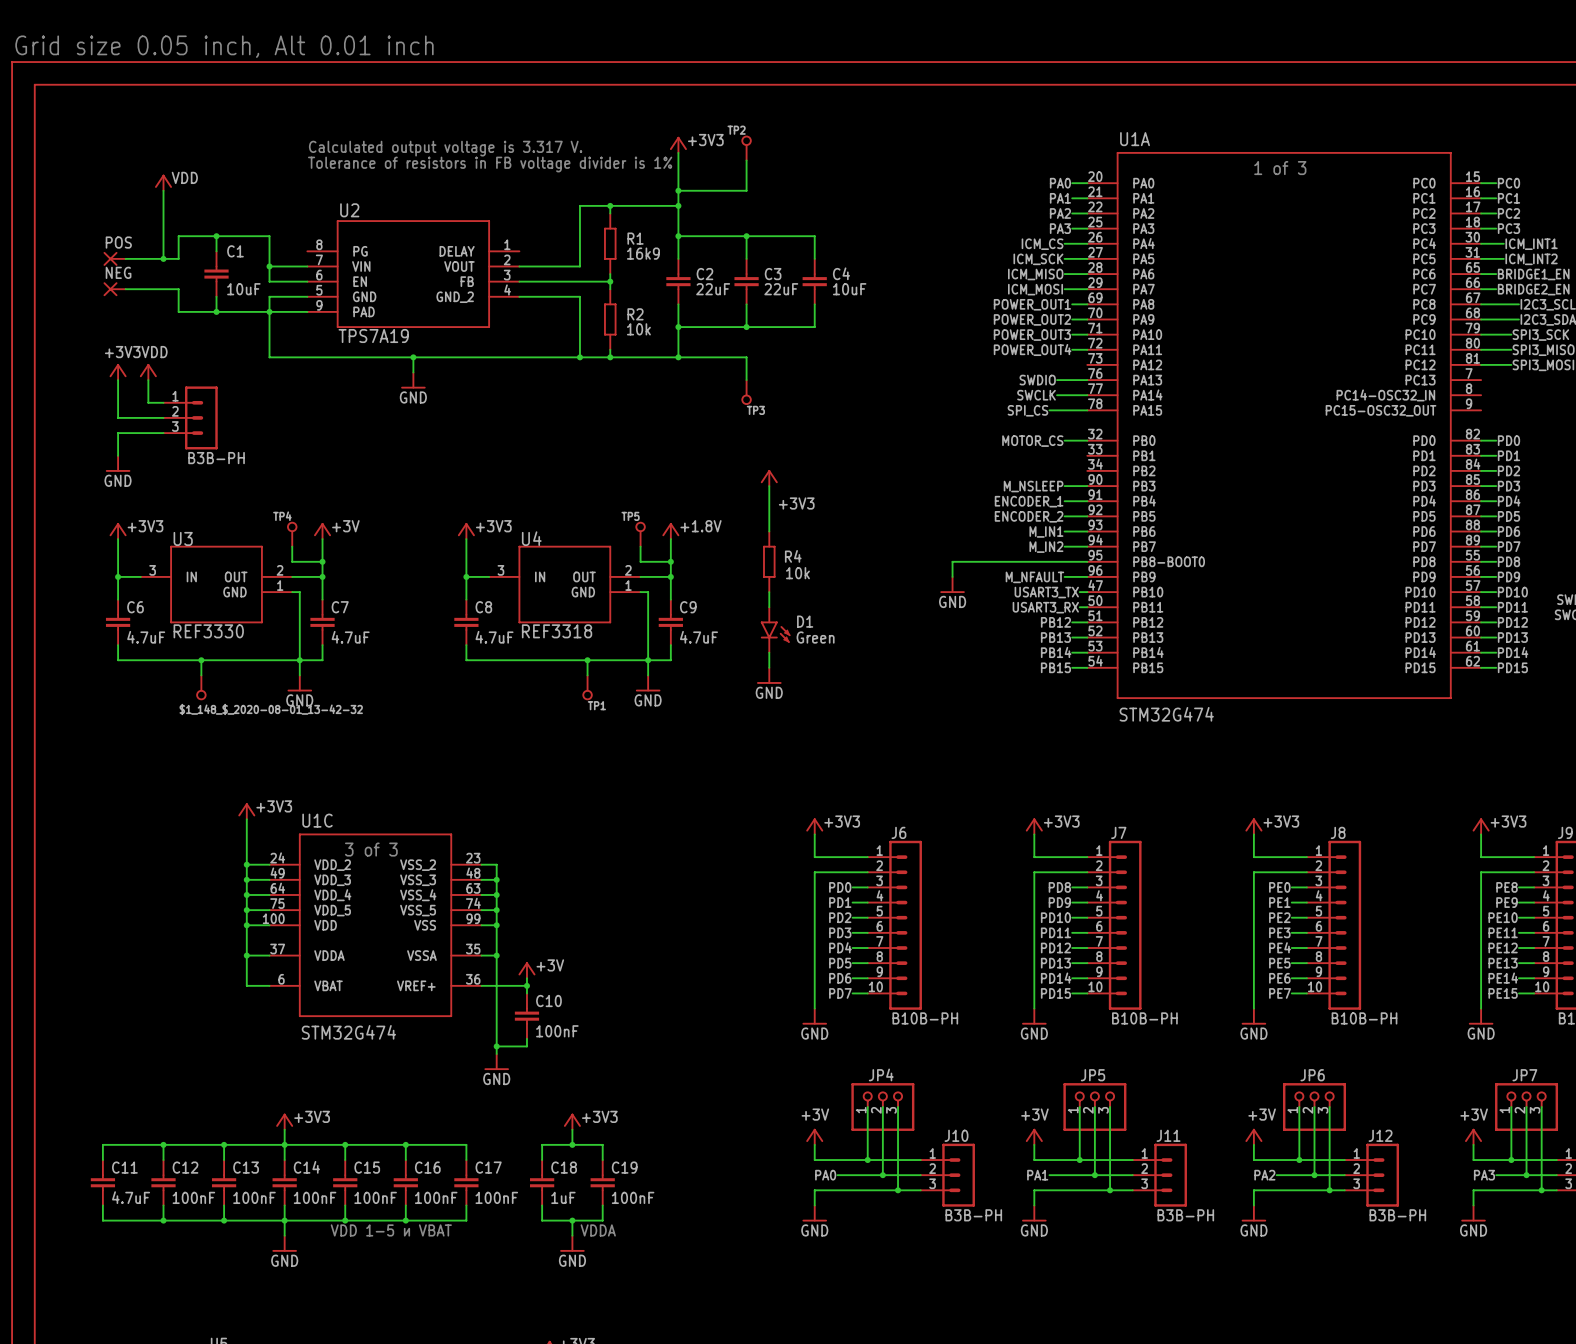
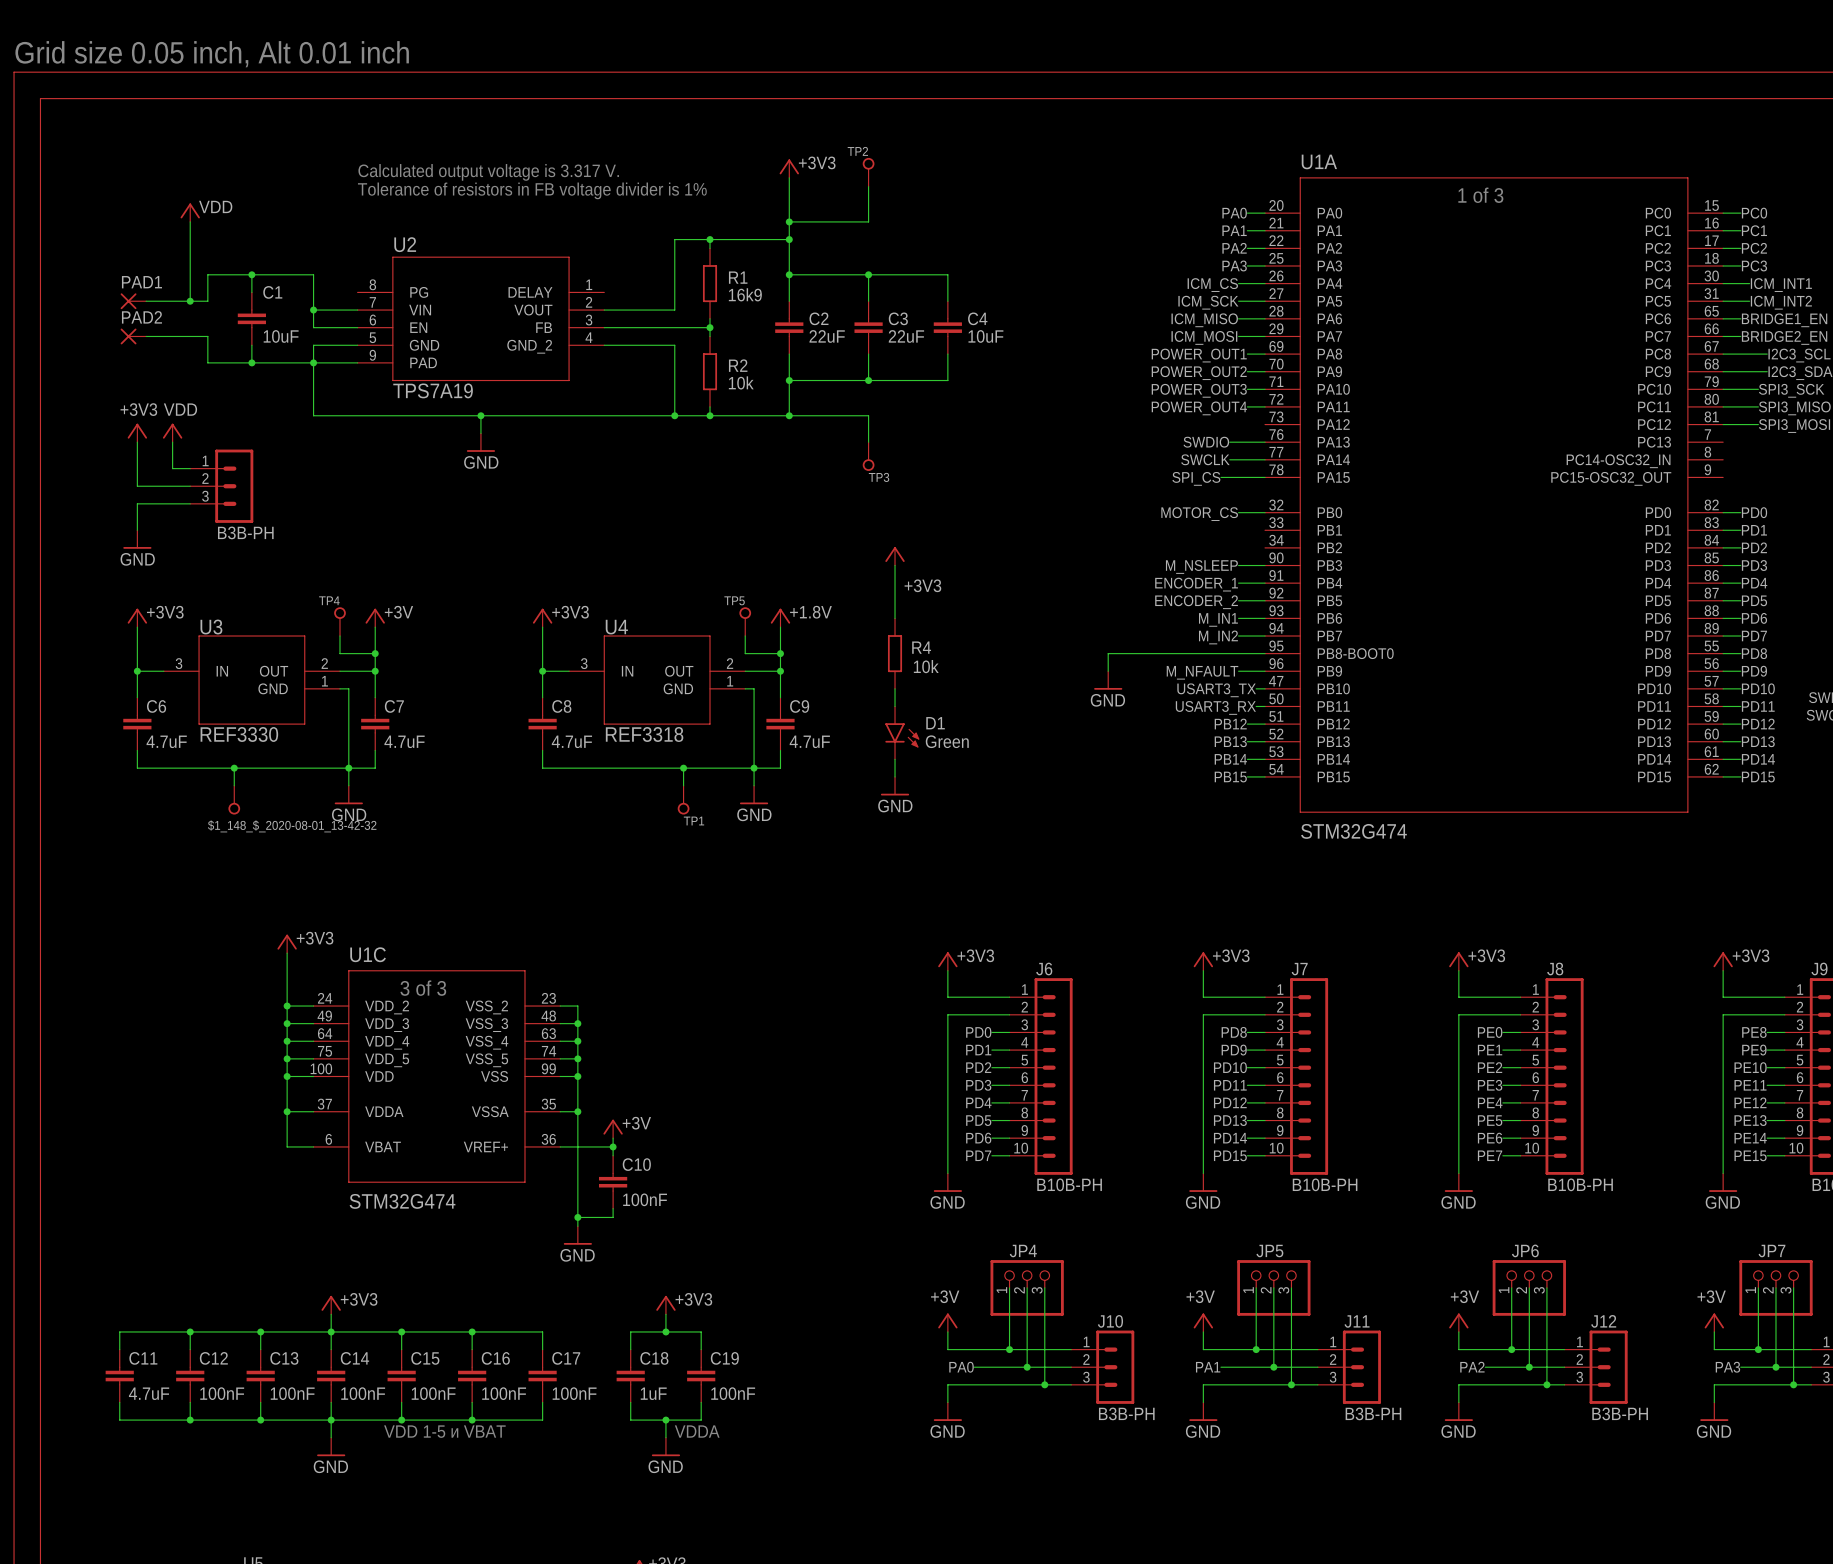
POS name: POS (118, 242) -> PAD1 (141, 282)
NEG name: NEG (118, 272) -> PAD2 (141, 317)

